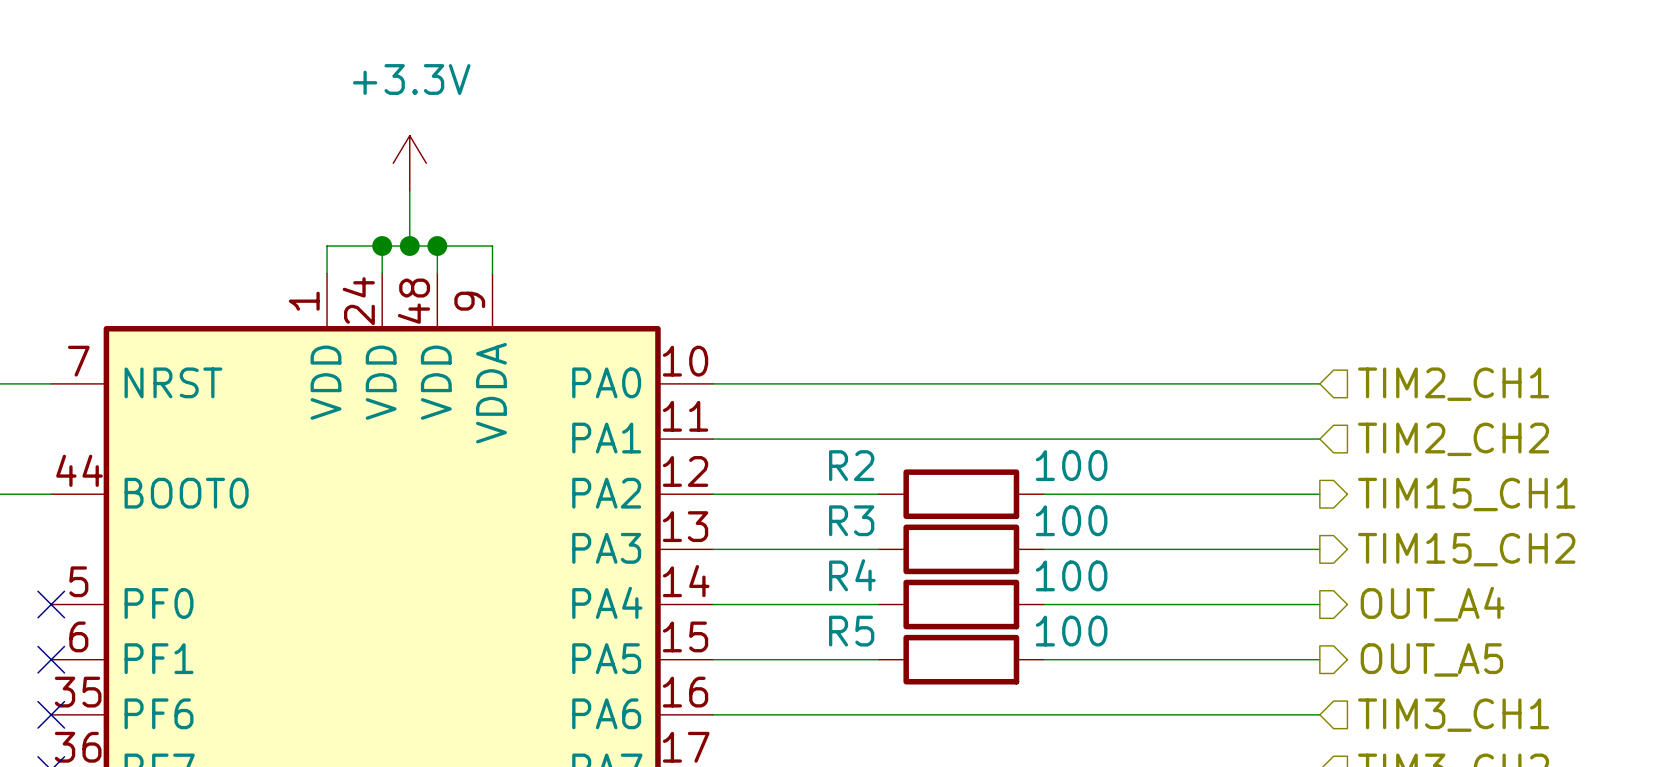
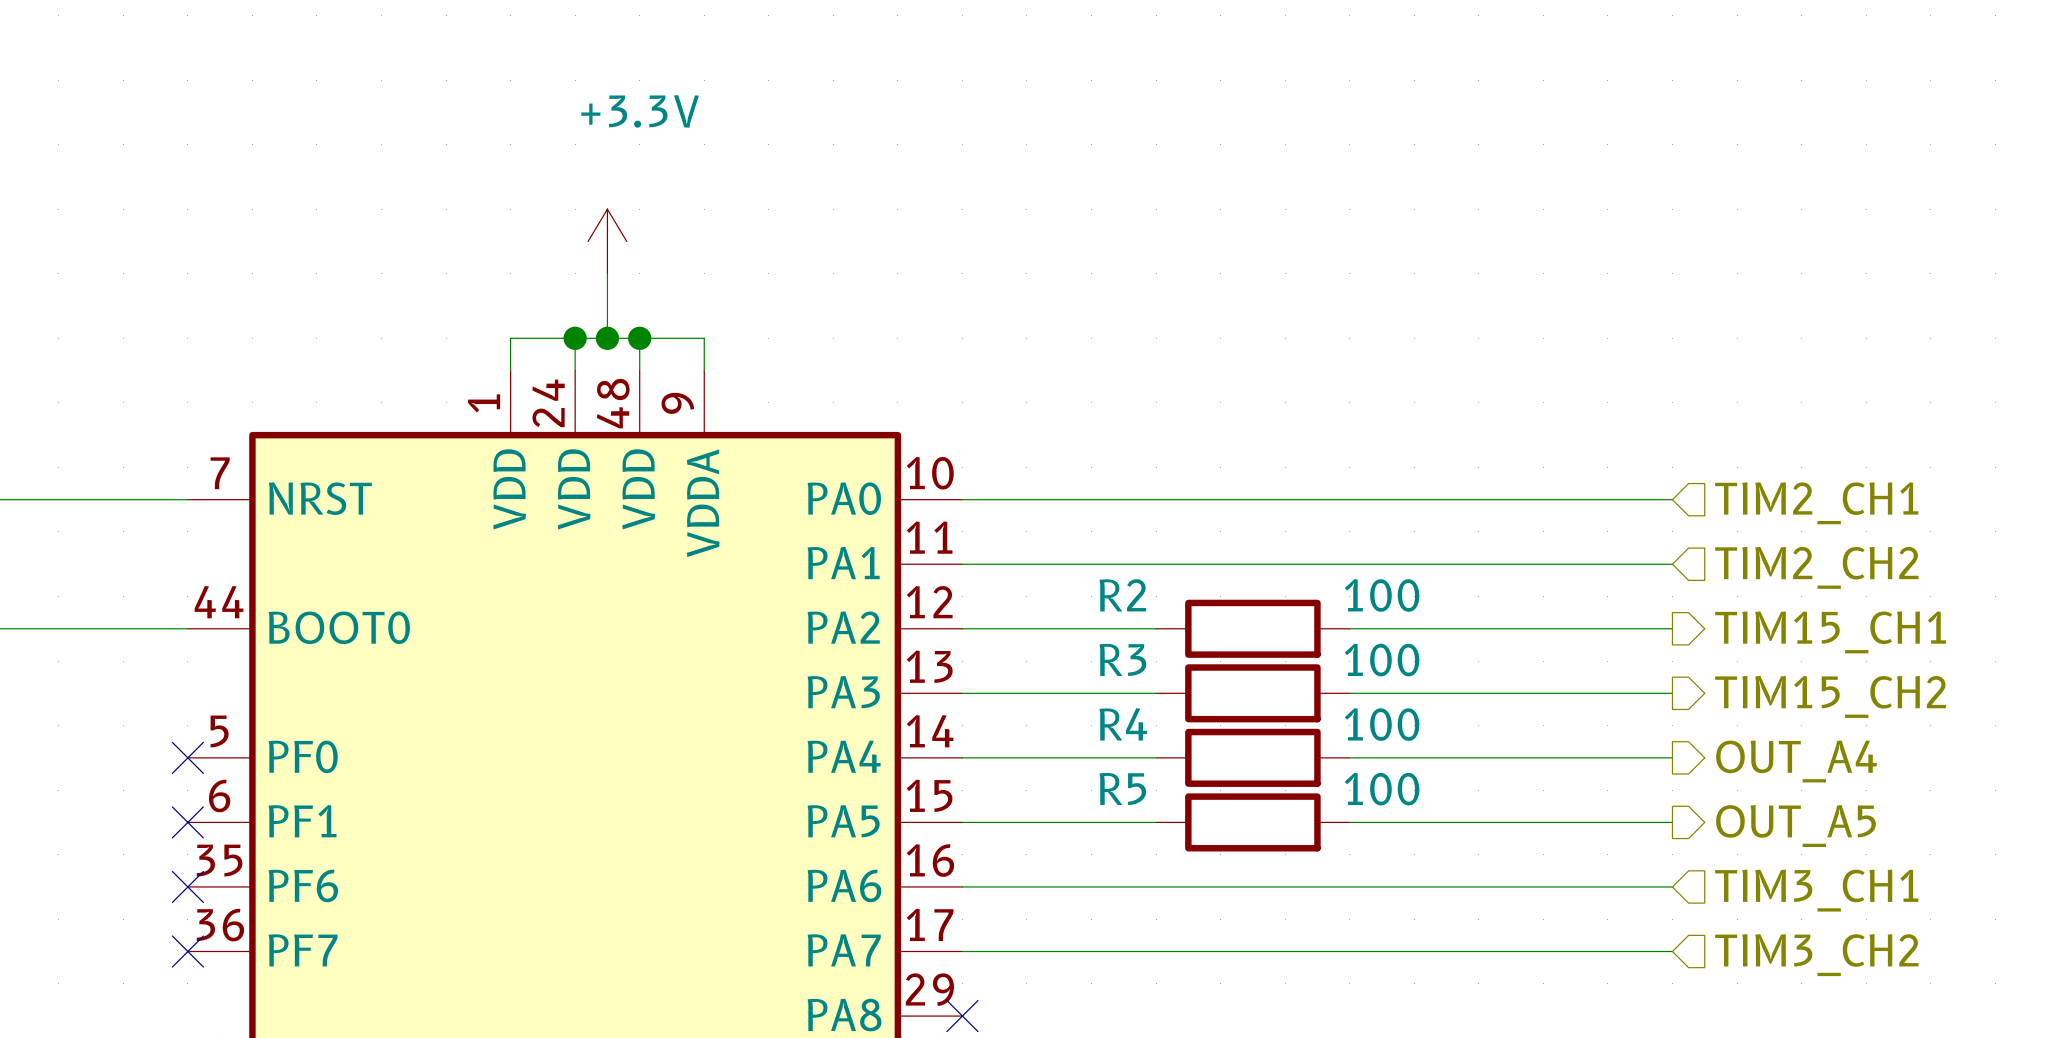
power symbol text position: +3.3V (411, 79) -> +3.3V (640, 111)

